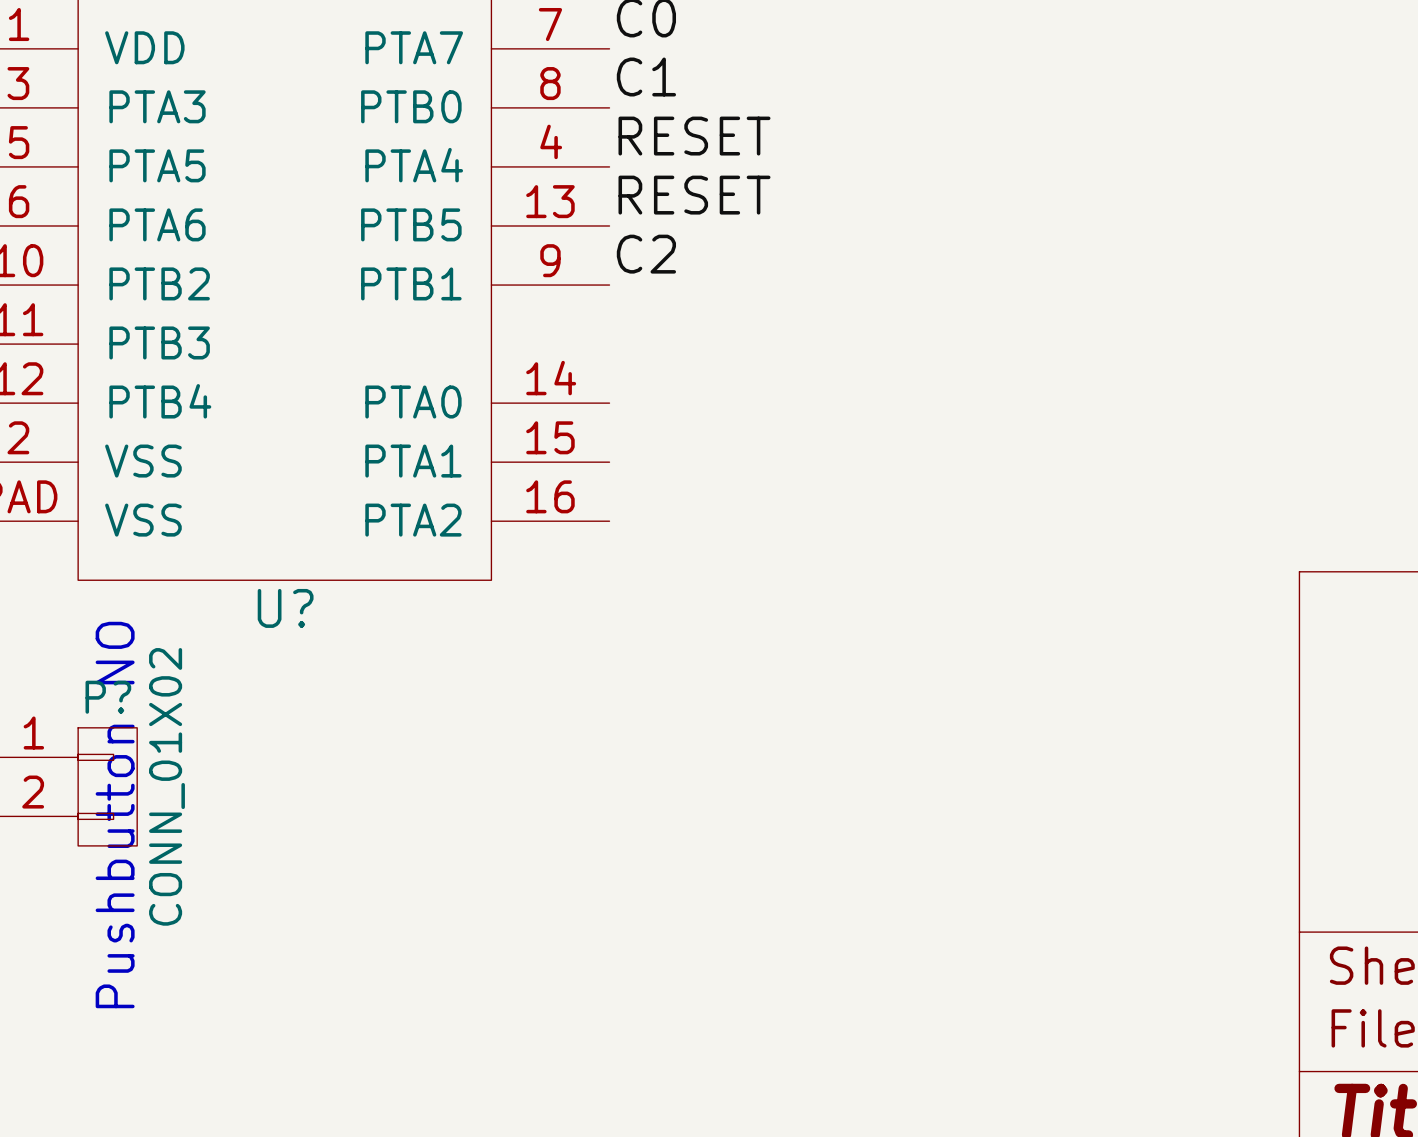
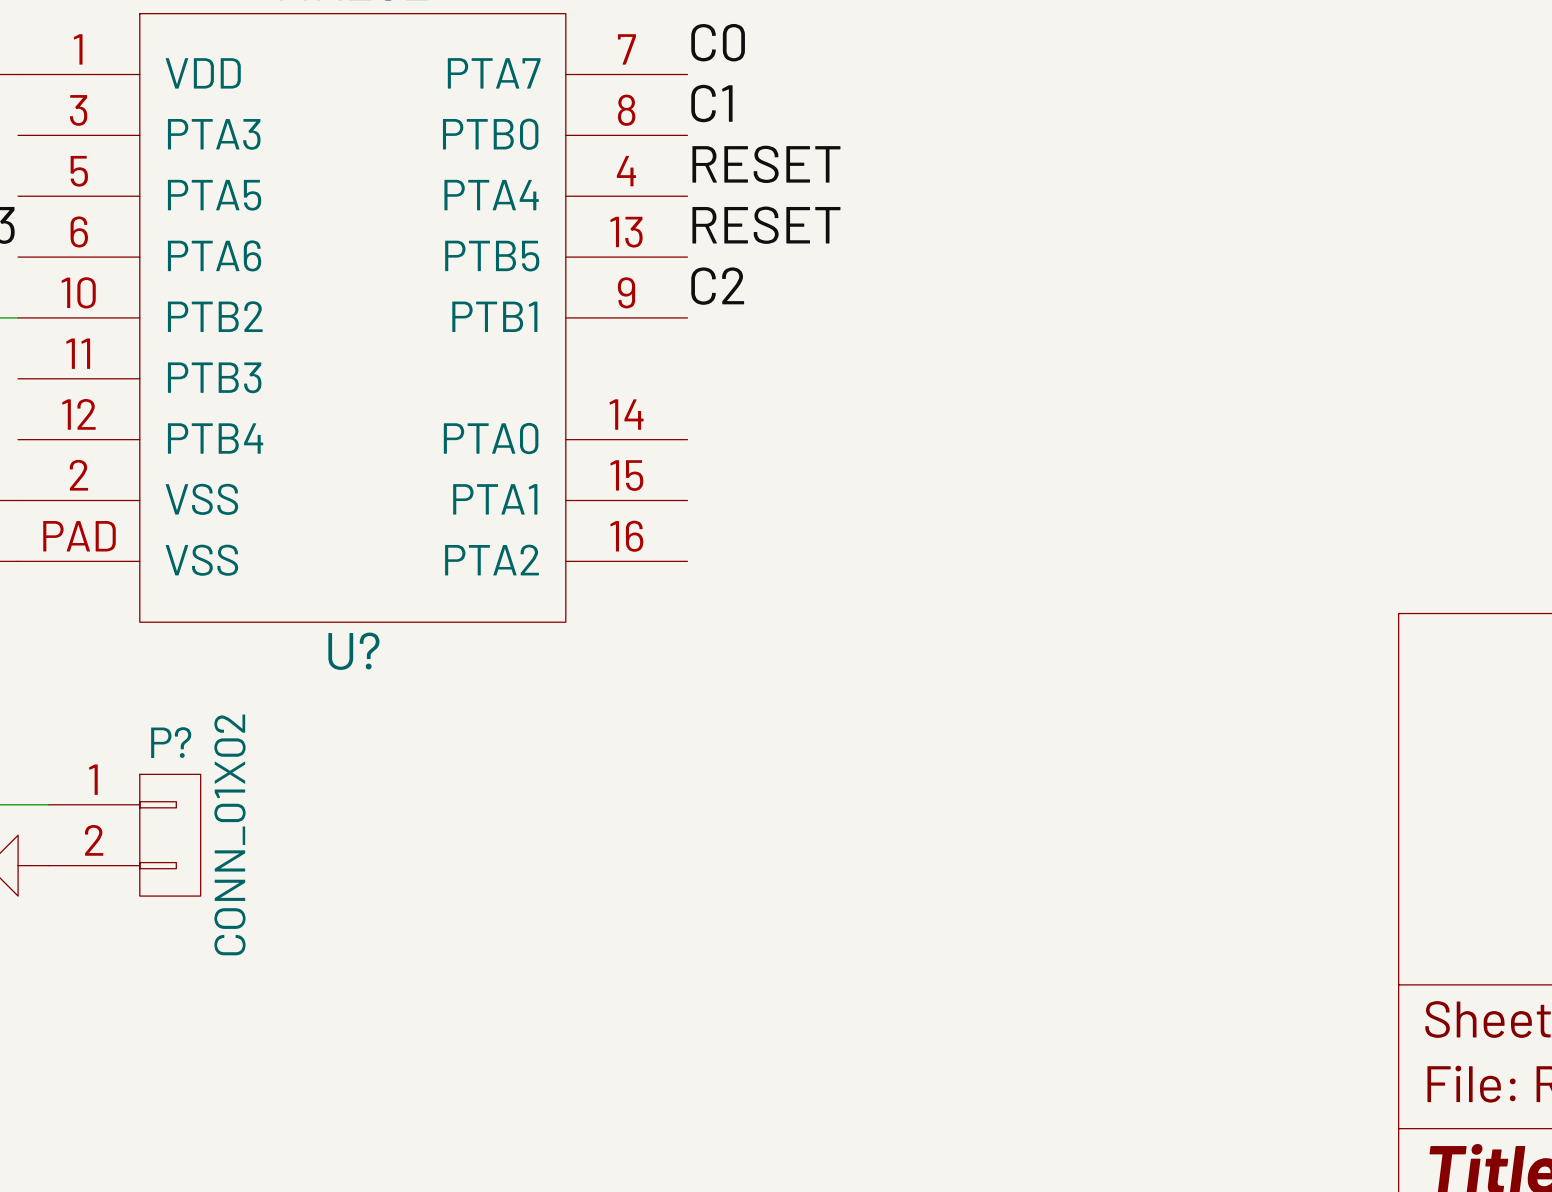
text: Pushbutton NO (115, 815) -> none

